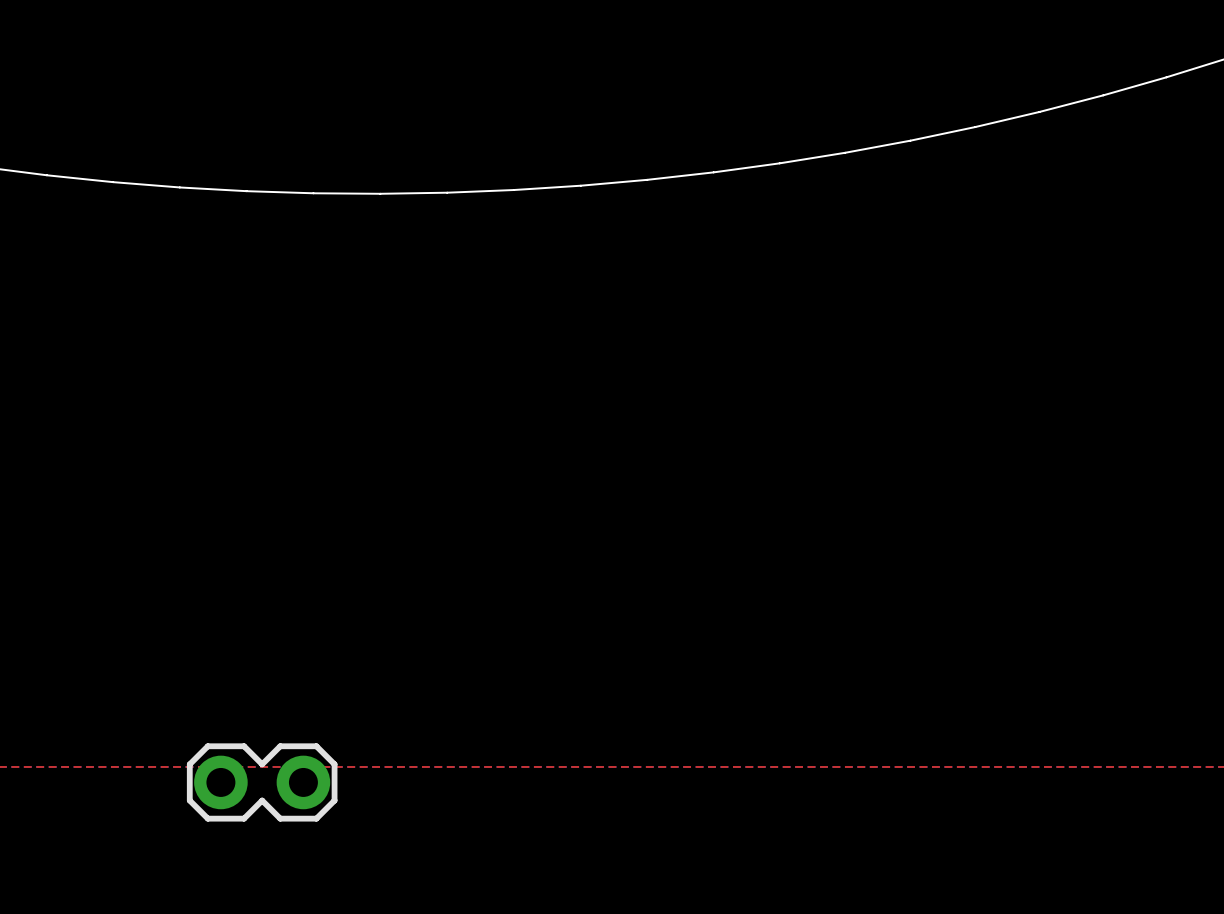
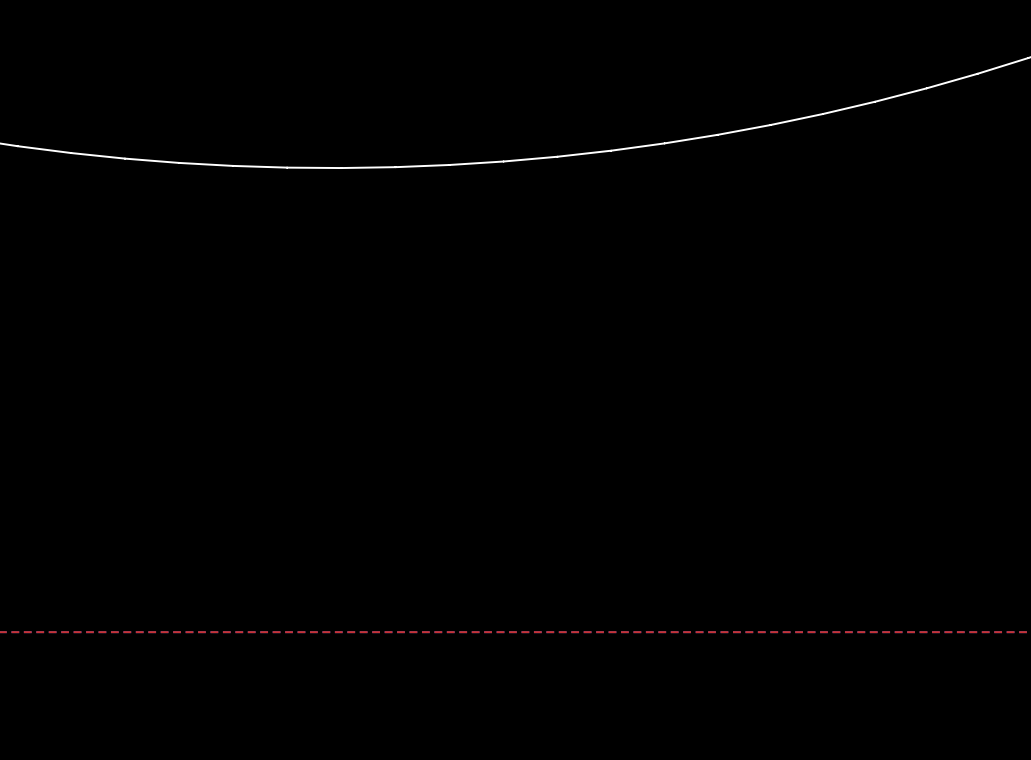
part: (262, 782) -> none

